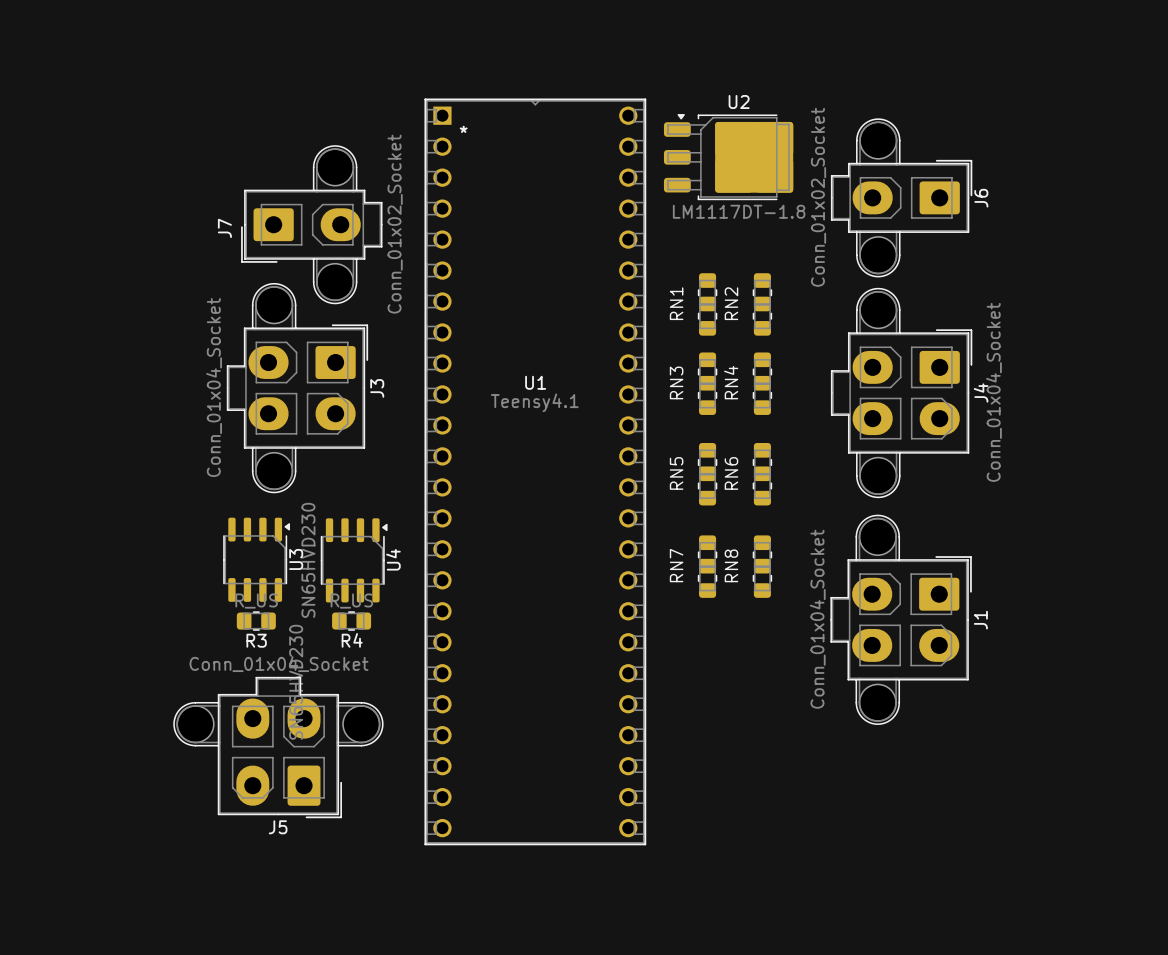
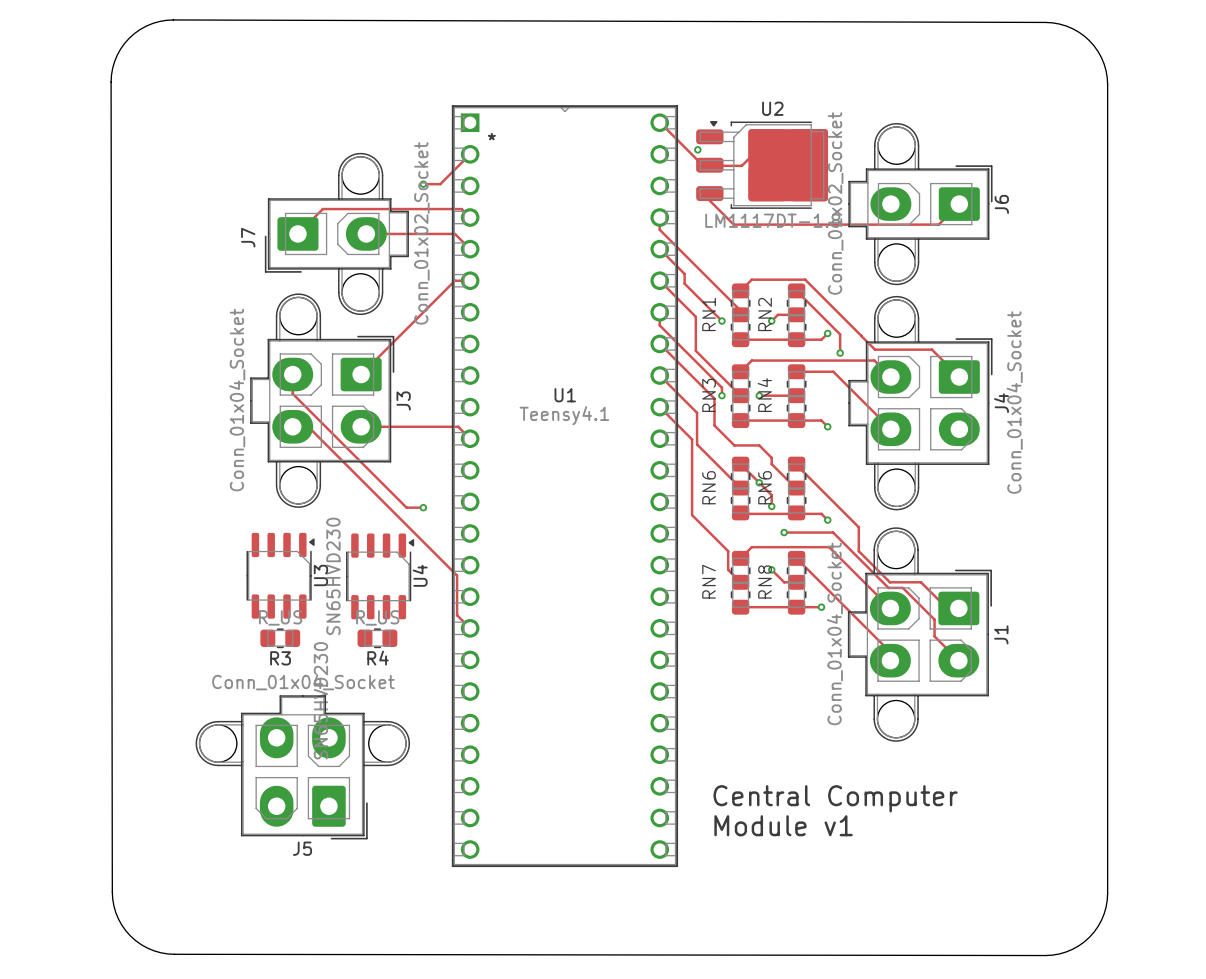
board edge: none -> (173, 19) (1045, 22) (1065, 25) (1078, 31) (1089, 40) (1098, 51) (1104, 64) (1107, 84) (1107, 893) (1106, 907) (1101, 920) (1089, 937) (1072, 949) (1059, 953) (1045, 955) (174, 954) (160, 952) (147, 948) (130, 936) (121, 925) (115, 912) (112, 892) (111, 82) (114, 61) (120, 49) (129, 38) (146, 26) (159, 21) (173, 19)
track: none -> (659, 122) (703, 165) (741, 165) (760, 146)
via: none -> (697, 149)
track: none -> (470, 154) (440, 184) (423, 184)
via: none -> (423, 184)
track: none -> (703, 194) (733, 224) (938, 224) (959, 204)
J6 position: (901, 197) -> (920, 204)
track: none -> (659, 217) (659, 229) (740, 310) (740, 314)
track: none -> (473, 221) (461, 209) (322, 209) (297, 233)
track: none -> (366, 233) (454, 233) (470, 249)
track: none -> (659, 249) (684, 274) (684, 283) (721, 321)
track: none -> (470, 280) (454, 280) (361, 374)
track: none -> (659, 280) (695, 316) (695, 350) (740, 395)
track: none -> (740, 290) (751, 279) (805, 279) (861, 335)
track: none -> (796, 290) (840, 334) (840, 353)
track: none -> (659, 312) (659, 325) (721, 387) (721, 395)
track: none -> (796, 314) (777, 314) (771, 321)
via: none -> (721, 321)
via: none -> (771, 321)
track: none -> (827, 333) (821, 339) (740, 339)
via: none -> (827, 333)
track: none -> (861, 335) (874, 349) (931, 349) (959, 377)
track: none -> (659, 343) (714, 398) (714, 425) (734, 445) (759, 445) (771, 457) (771, 464) (796, 488)
via: none -> (840, 353)
track: none -> (740, 371) (751, 360) (874, 360) (890, 377)
track: none -> (796, 371) (833, 371) (890, 429)
track: none -> (292, 374) (292, 393) (406, 507) (423, 507)
track: none -> (659, 375) (697, 412) (697, 444) (740, 488)
via: none -> (721, 395)
track: none -> (759, 395) (796, 395)
via: none -> (759, 395)
J4 position: (901, 393) -> (920, 403)
track: none -> (659, 407) (692, 439) (692, 515) (728, 551) (728, 569) (740, 582)
track: none -> (740, 420) (821, 420) (827, 426)
track: none -> (292, 426) (308, 426) (457, 575) (457, 615) (470, 628)
track: none -> (361, 426) (458, 426) (470, 438)
via: none -> (827, 426)
track: none -> (740, 464) (771, 495) (771, 506)
track: none -> (796, 465) (858, 527) (858, 551) (889, 582) (921, 582) (947, 608) (958, 608)
via: none -> (759, 482)
RN5 name: RN5 (676, 473) -> RN6 (709, 487)
via: none -> (771, 506)
via: none -> (423, 507)
track: none -> (740, 512) (821, 513) (827, 520)
via: none -> (827, 520)
track: none -> (784, 532) (833, 532) (888, 587) (902, 587) (934, 619) (934, 636) (958, 660)
via: none -> (784, 532)
track: none -> (740, 558) (751, 547) (829, 547) (890, 608)
track: none -> (796, 558) (890, 652) (890, 660)
track: none -> (771, 569) (784, 582) (796, 582)
via: none -> (771, 569)
track: none -> (740, 607) (821, 607)
via: none -> (821, 607)
J1 position: (901, 619) -> (919, 634)
text: none -> Central Computer (835, 798)
text: none -> Module v1 (783, 825)

